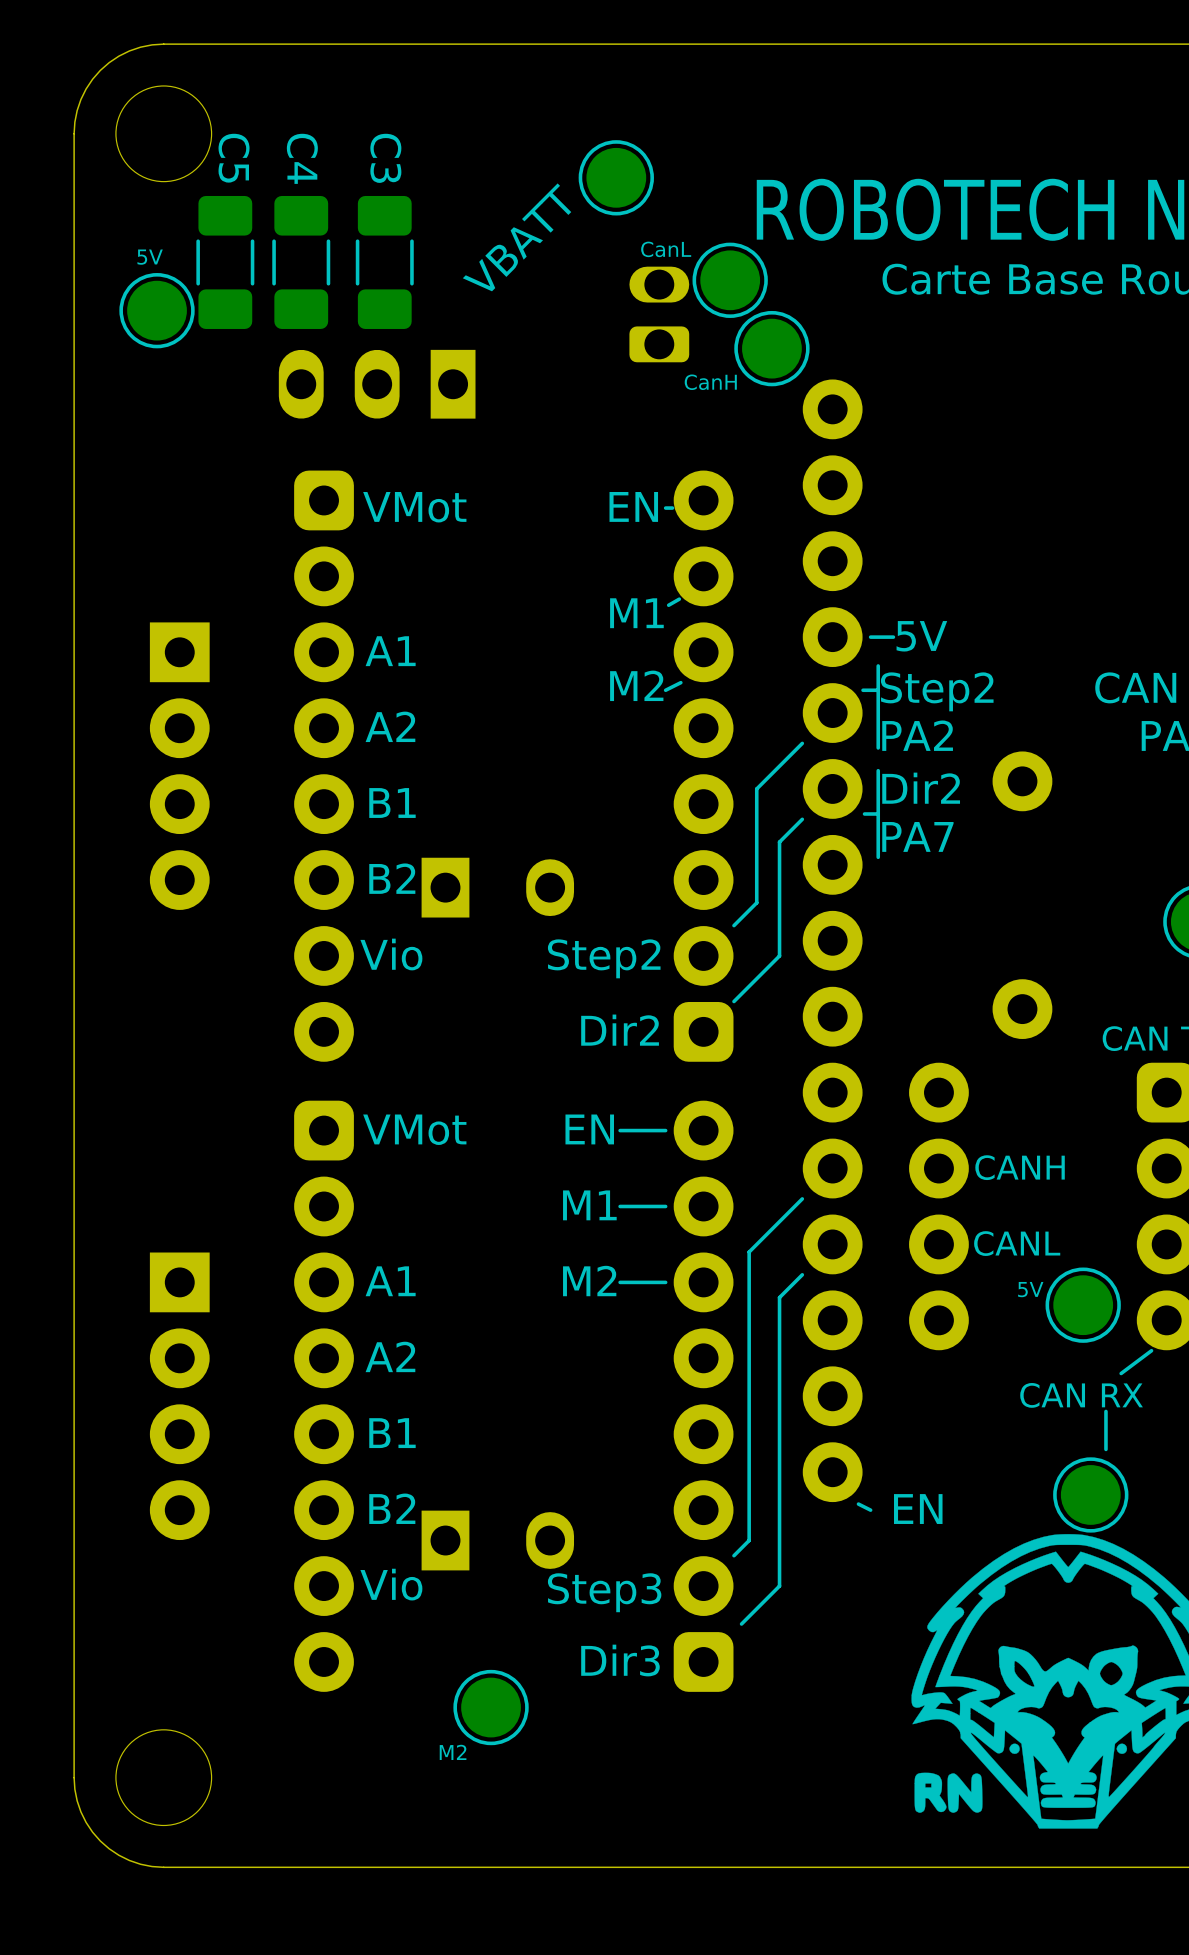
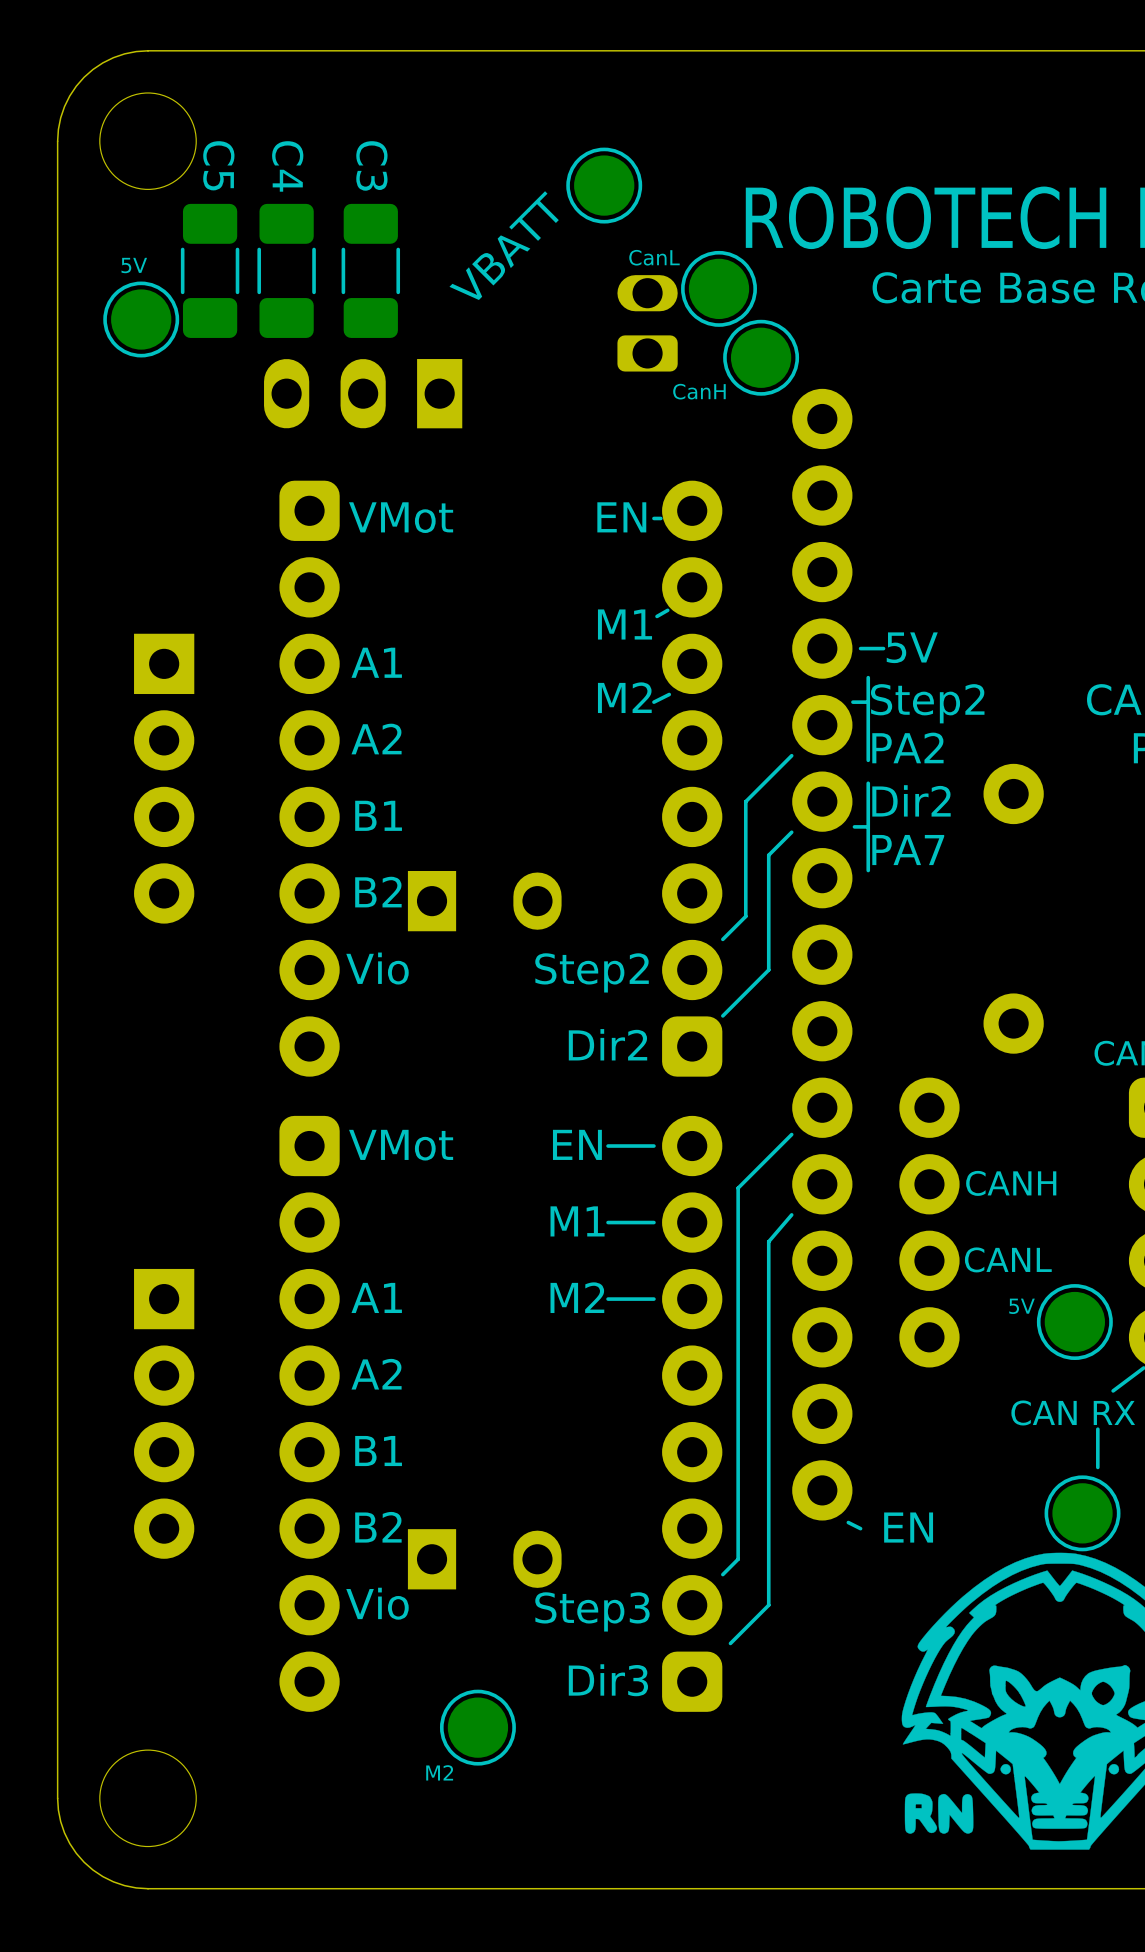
line: none -> (791, 1134) (738, 1188) (738, 1268)
line: (802, 1198) (749, 1252) -> (791, 1214) (768, 1241) (768, 1314)
line: (802, 1274) (779, 1297) -> none

